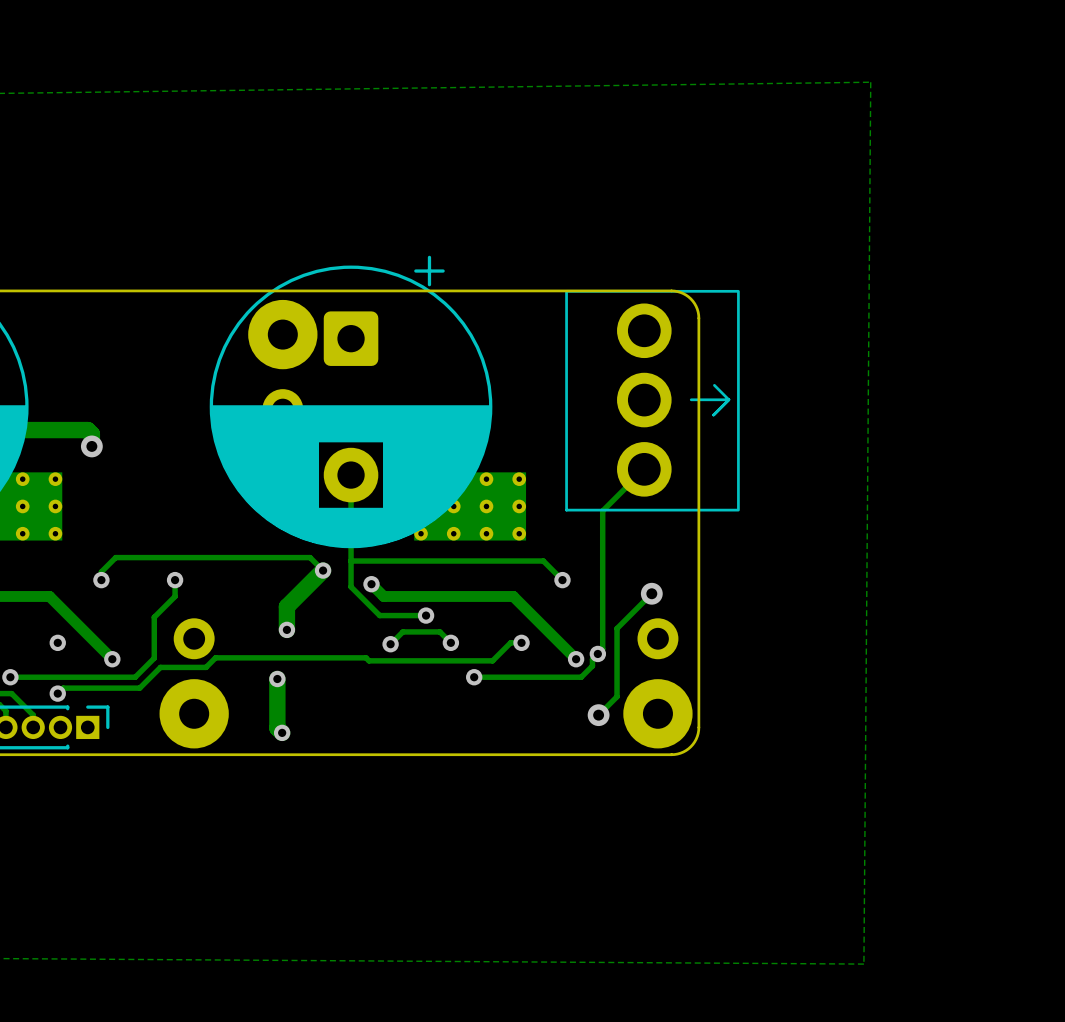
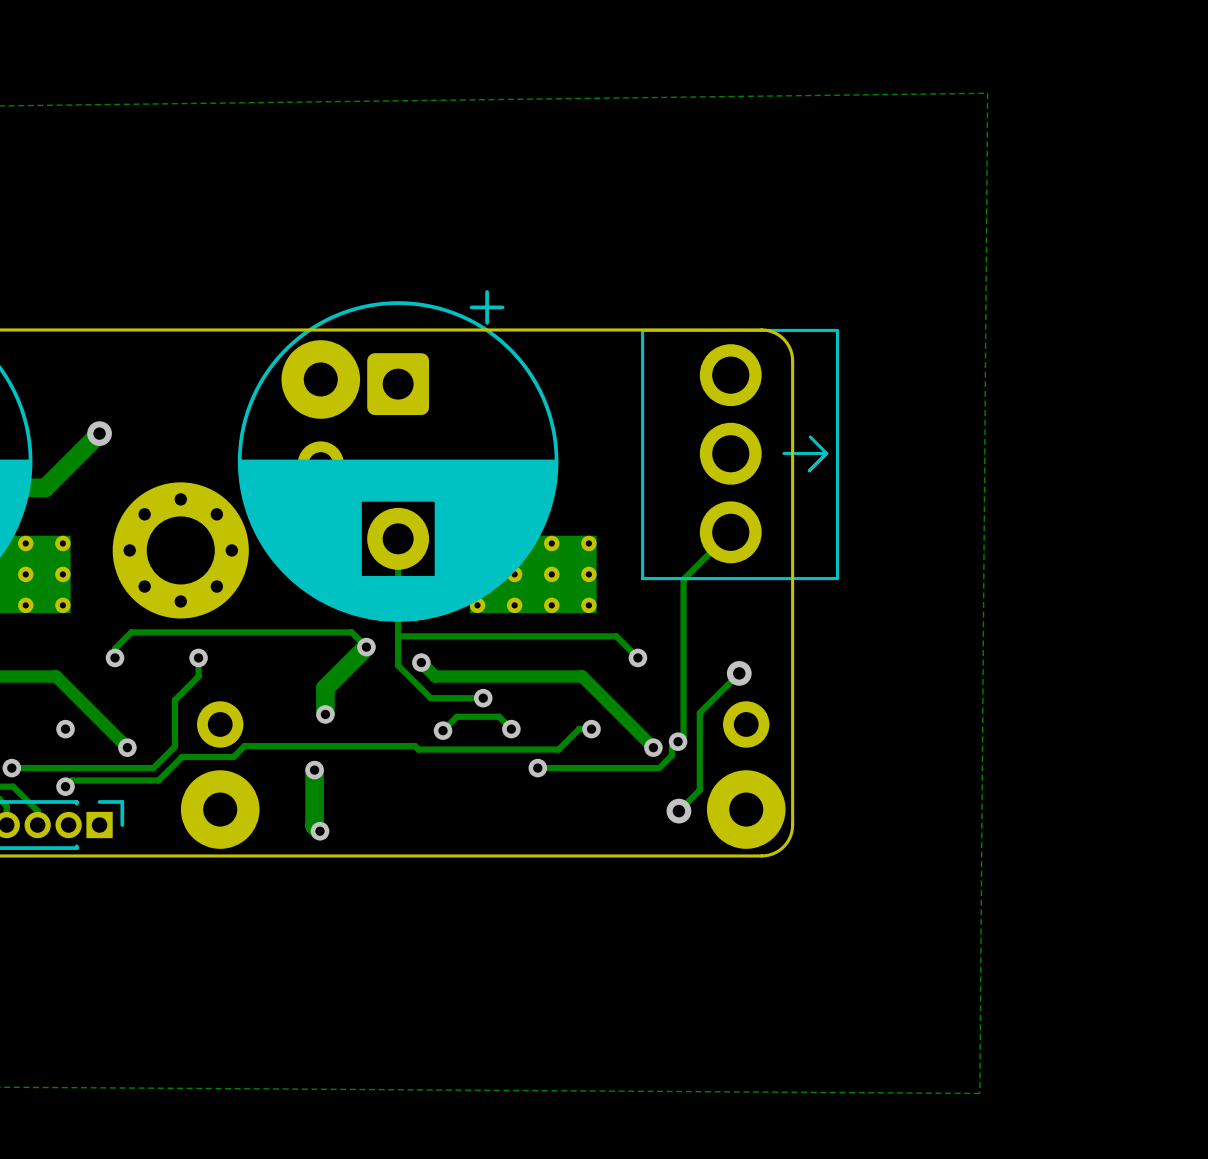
track: (40, 430) (87, 430) (91, 434) (91, 446) -> (45, 487) (99, 433)
via position: (91, 446) -> (99, 433)
part: none -> (180, 550)

